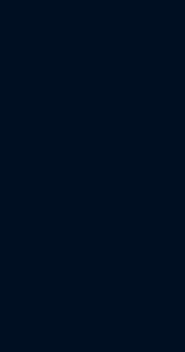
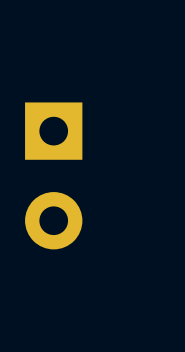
part: none -> (53, 175)

